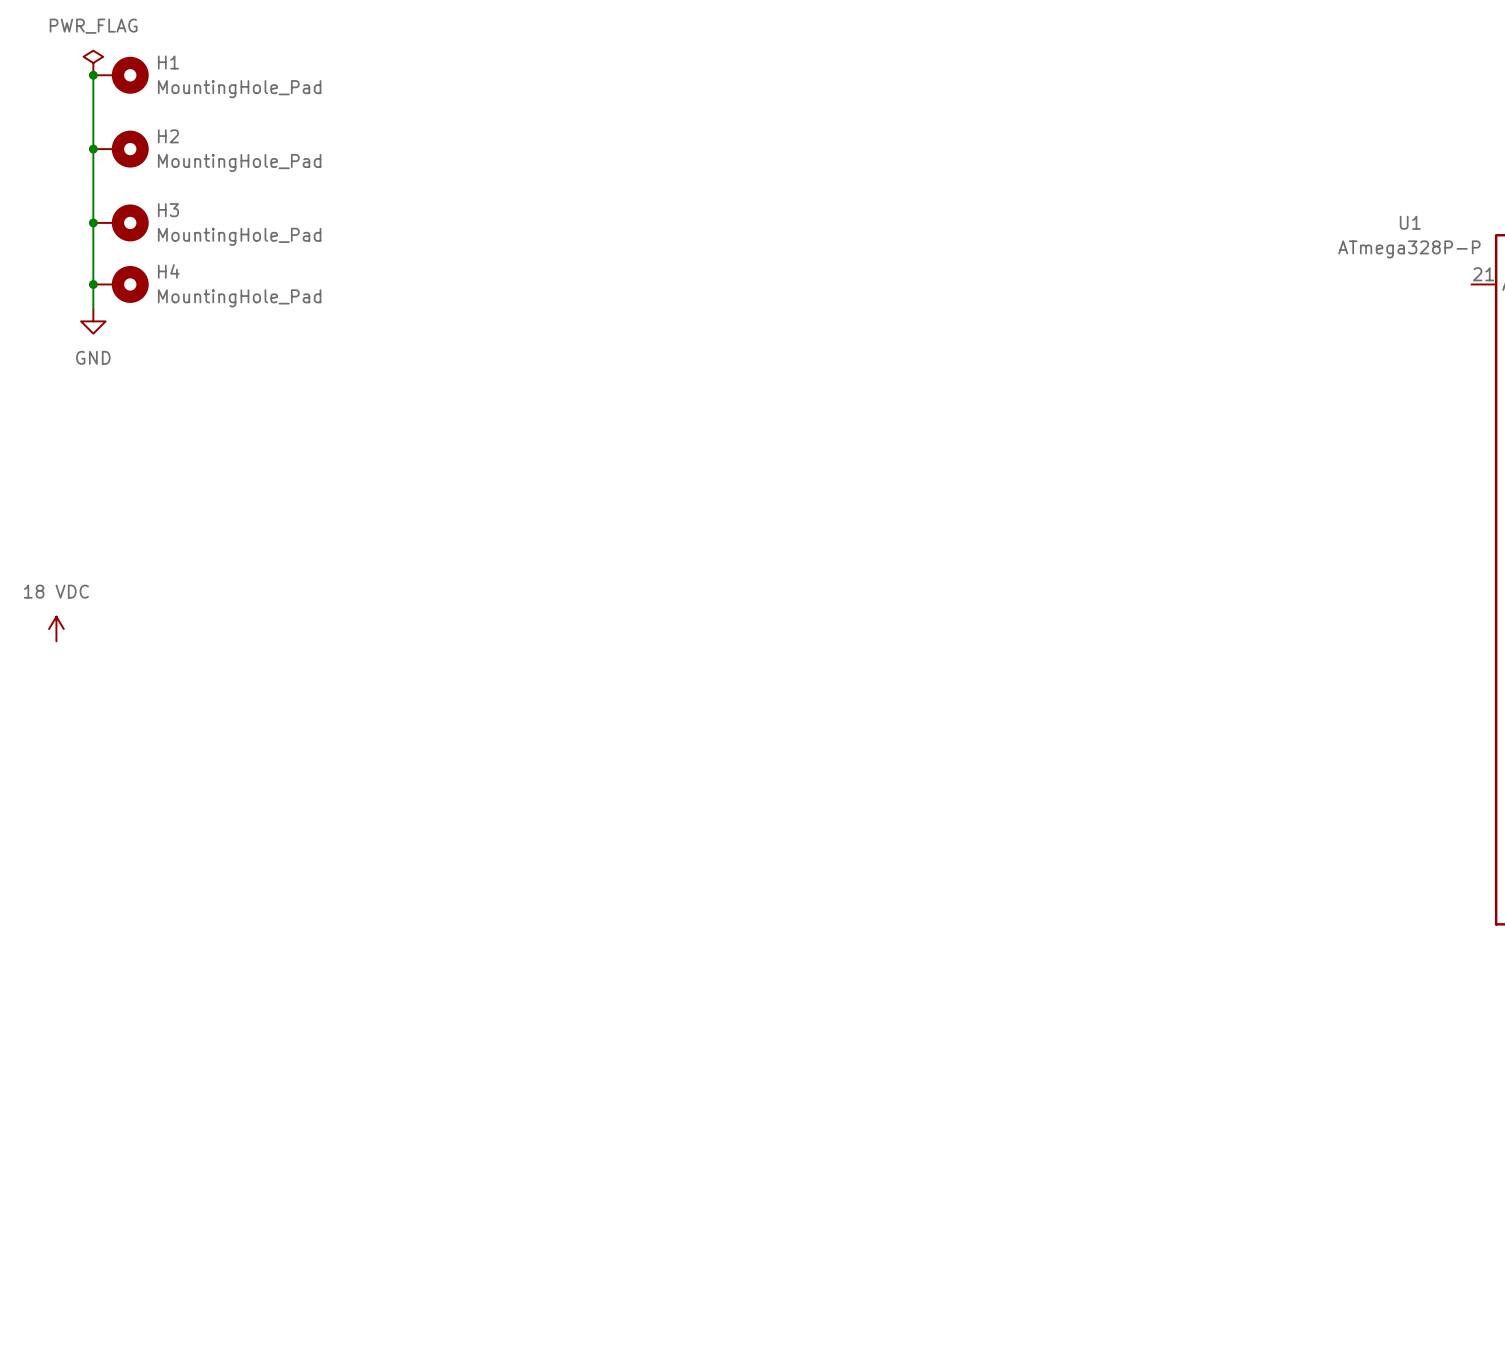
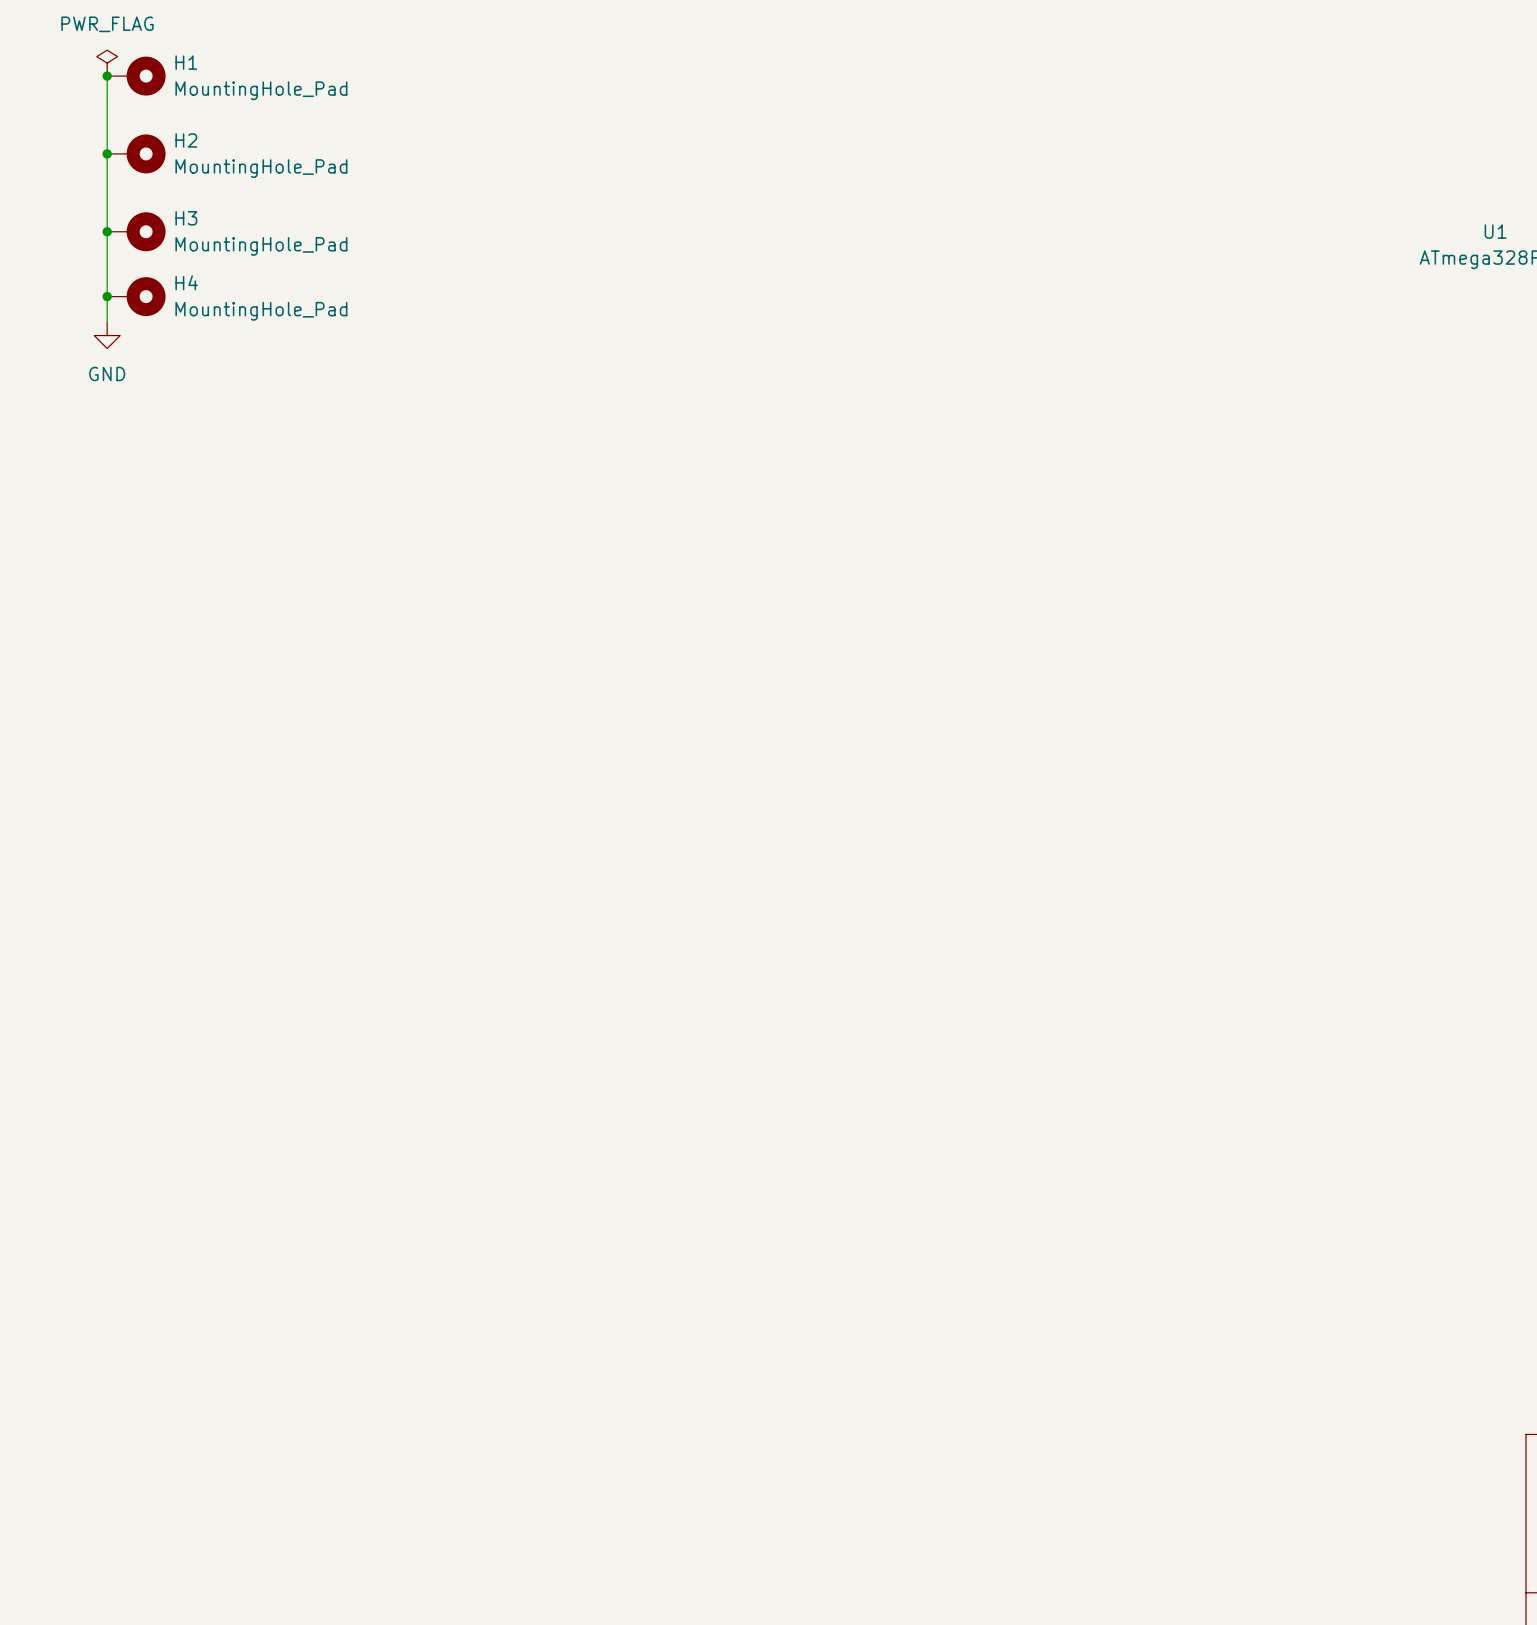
power symbol: 18 VDC (56, 629) -> none

